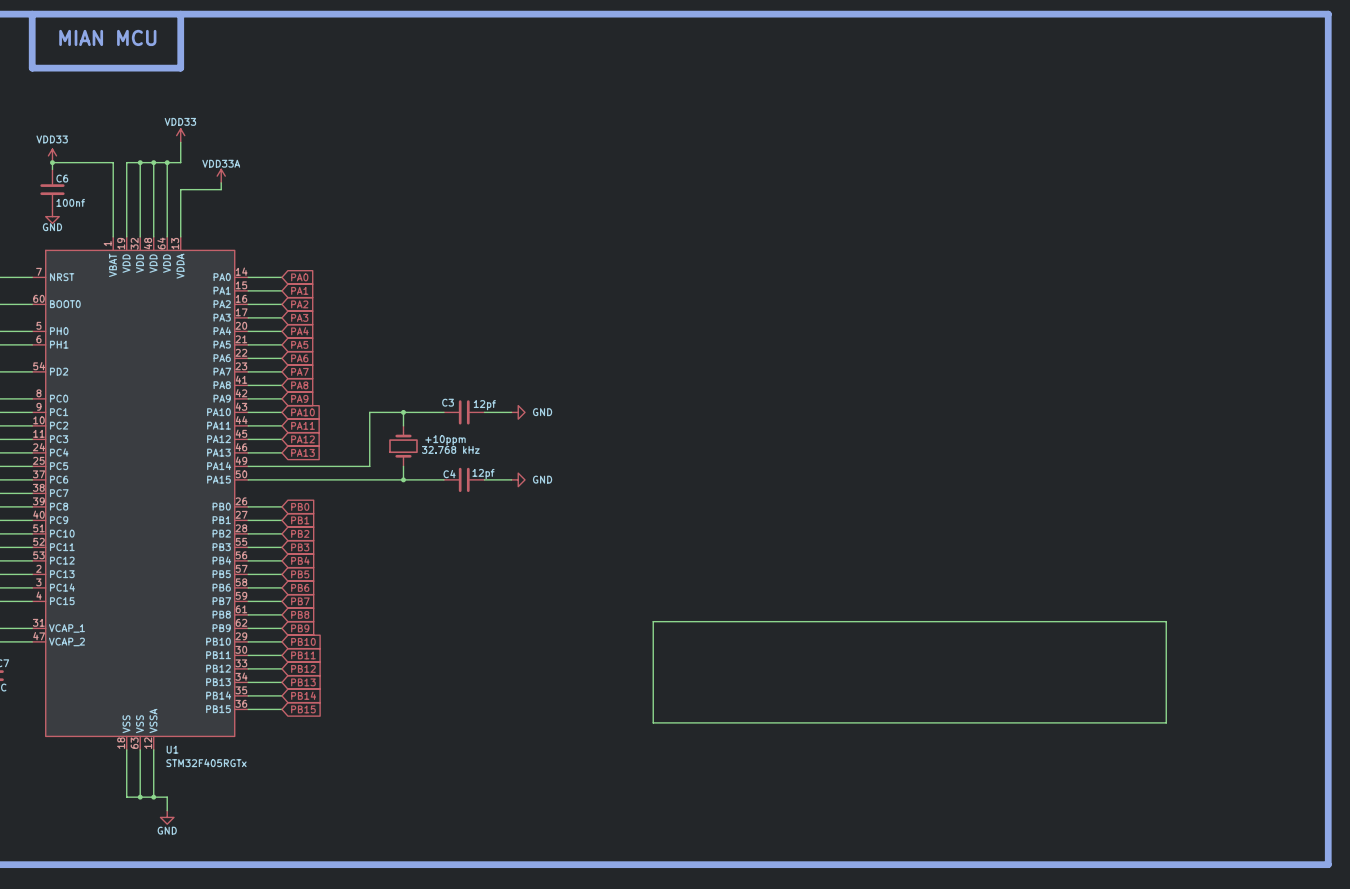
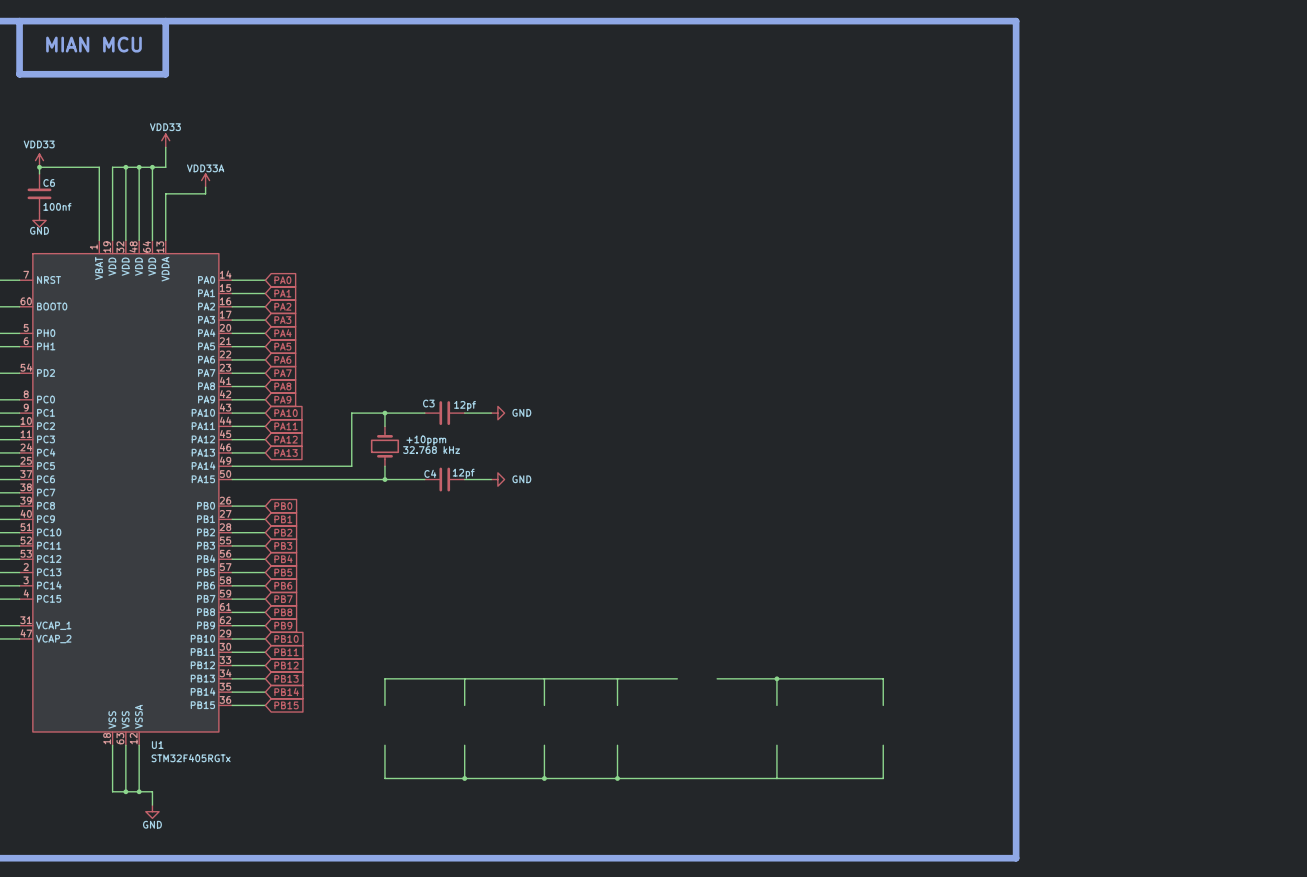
line: (1044, 14) (1328, 14) (1328, 864) (1044, 864) -> (1016, 21) (1016, 858)
wire: (653, 621) (653, 722) (1166, 722) (1166, 621) (653, 621) -> none
wire: none -> (464, 678) (464, 705)
wire: none -> (544, 678) (544, 705)
wire: none -> (617, 678) (617, 705)
wire: none -> (677, 678) (384, 678) (384, 705)
wire: none -> (717, 678) (883, 678) (883, 705)
wire: none -> (776, 678) (776, 705)
junction: none -> (776, 678)
wire: none -> (384, 745) (384, 778) (883, 778) (883, 745)
wire: none -> (464, 745) (464, 778)
wire: none -> (544, 745) (544, 778)
wire: none -> (617, 745) (617, 778)
wire: none -> (776, 745) (776, 778)
junction: none -> (464, 778)
junction: none -> (544, 778)
junction: none -> (617, 778)

